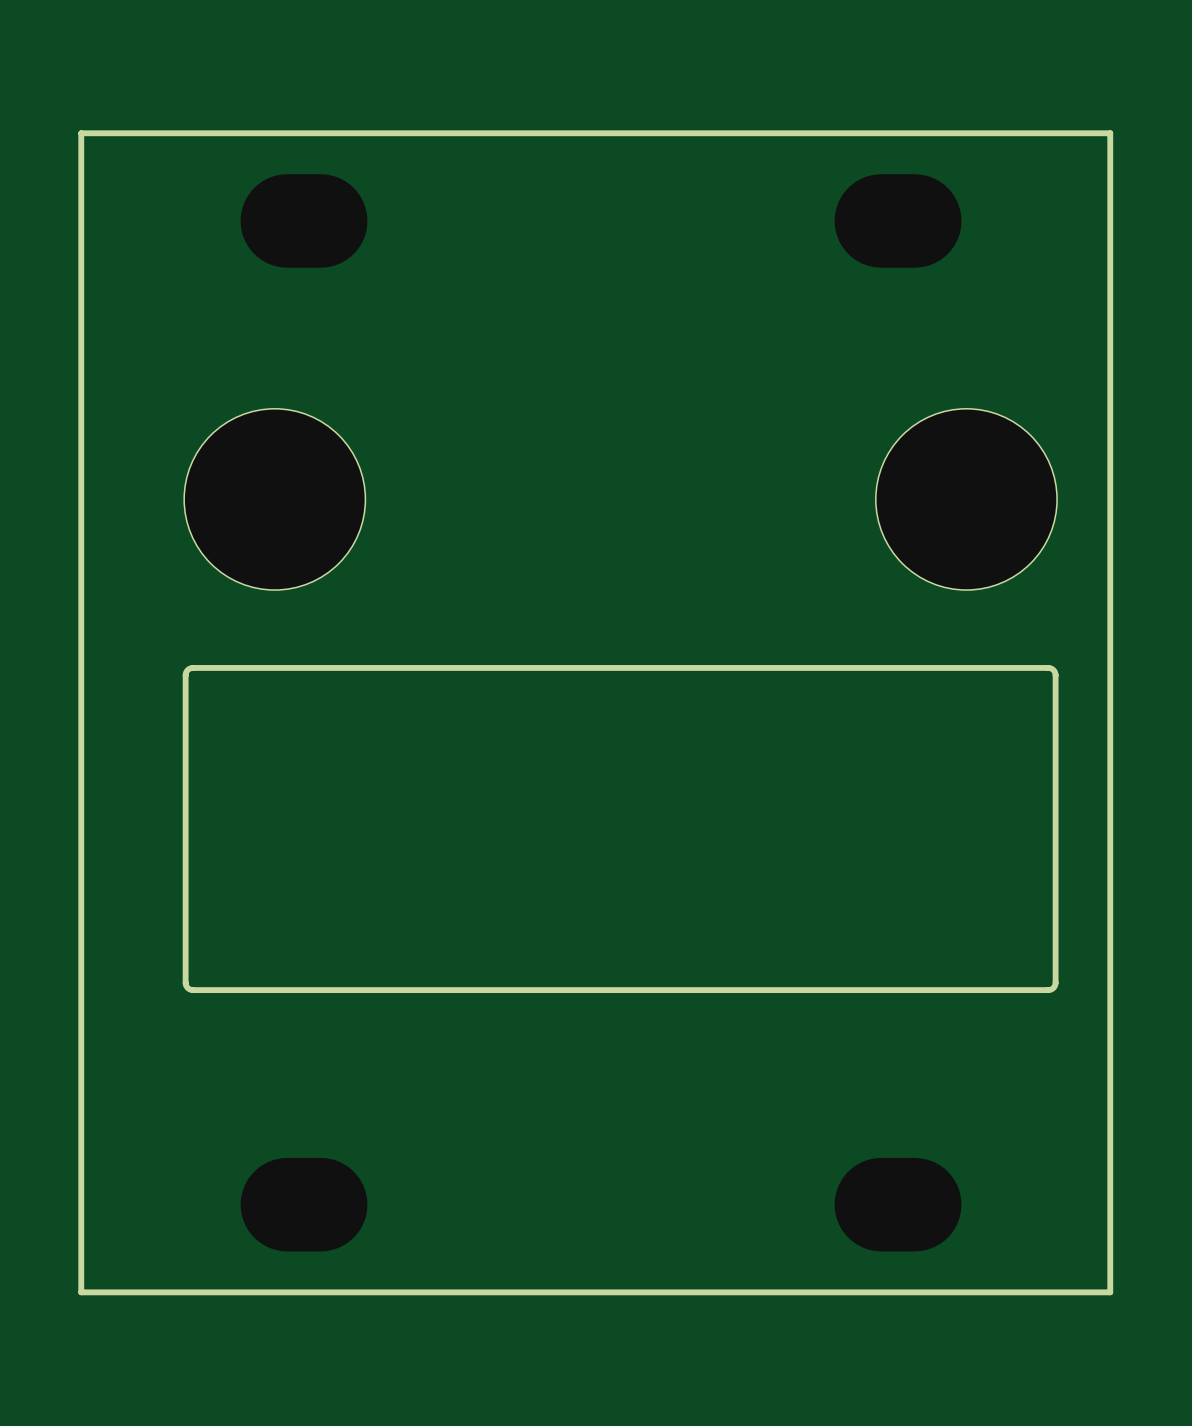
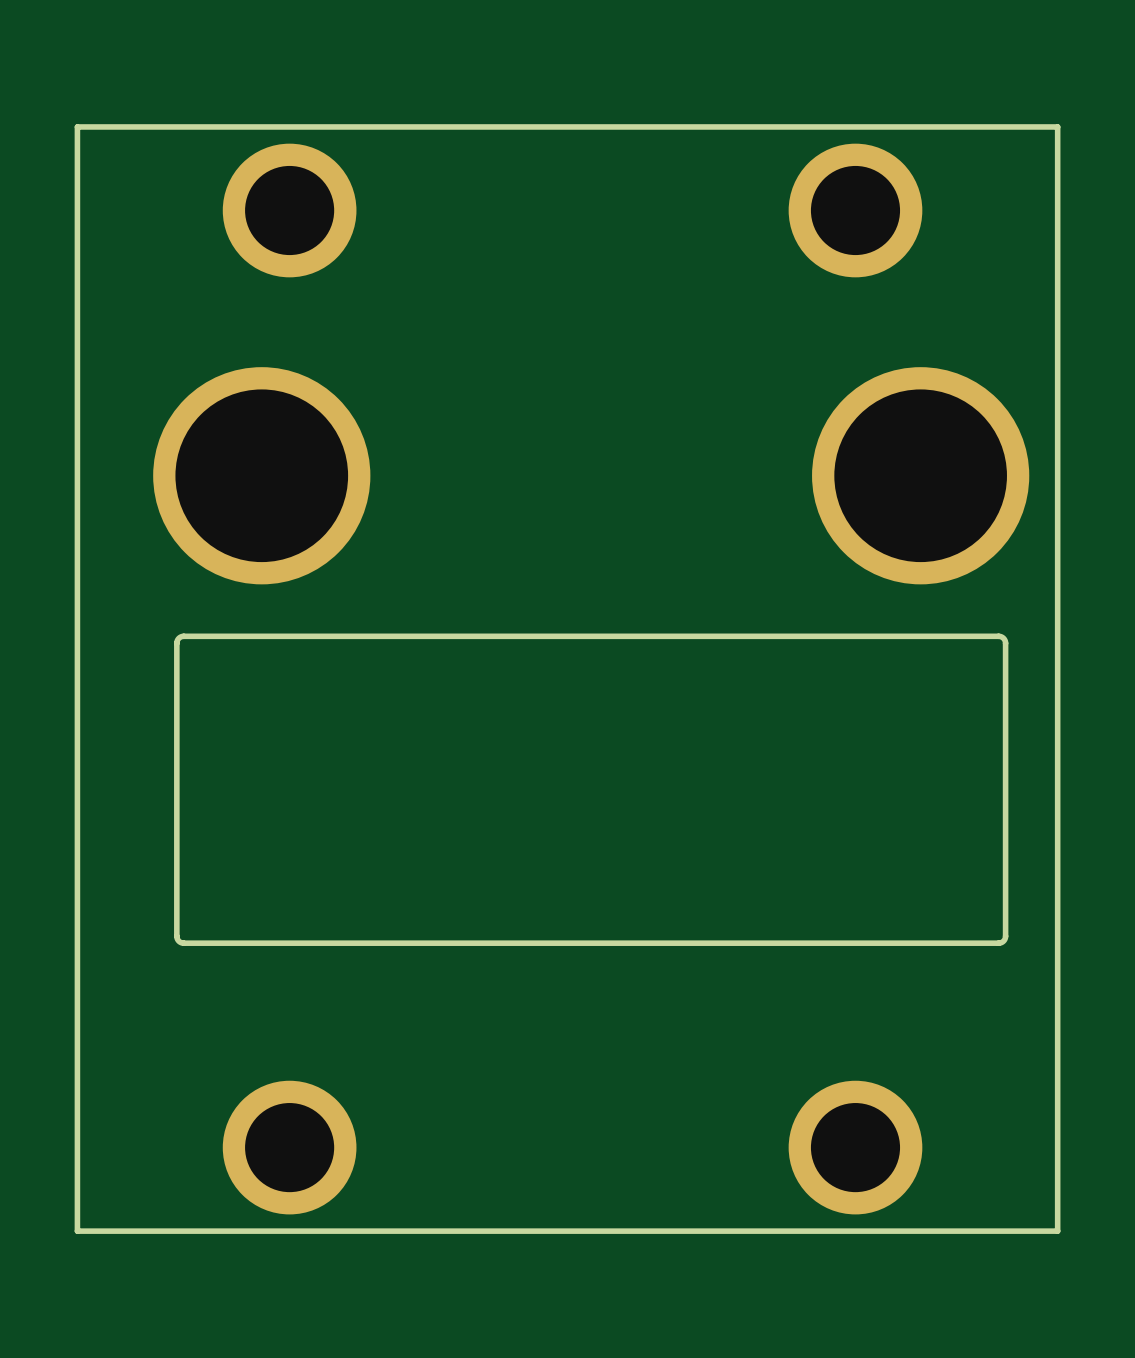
part footprint: [240, 174, 368, 268] -> [222, 143, 357, 278]
part footprint: [834, 174, 962, 268] -> [788, 143, 923, 278]
part footprint: [184, 408, 366, 591] -> [153, 367, 371, 585]
part footprint: [875, 408, 1058, 591] -> [812, 367, 1030, 585]
part footprint: [240, 1157, 368, 1252] -> [222, 1080, 357, 1215]
part footprint: [834, 1157, 962, 1252] -> [788, 1080, 923, 1215]

